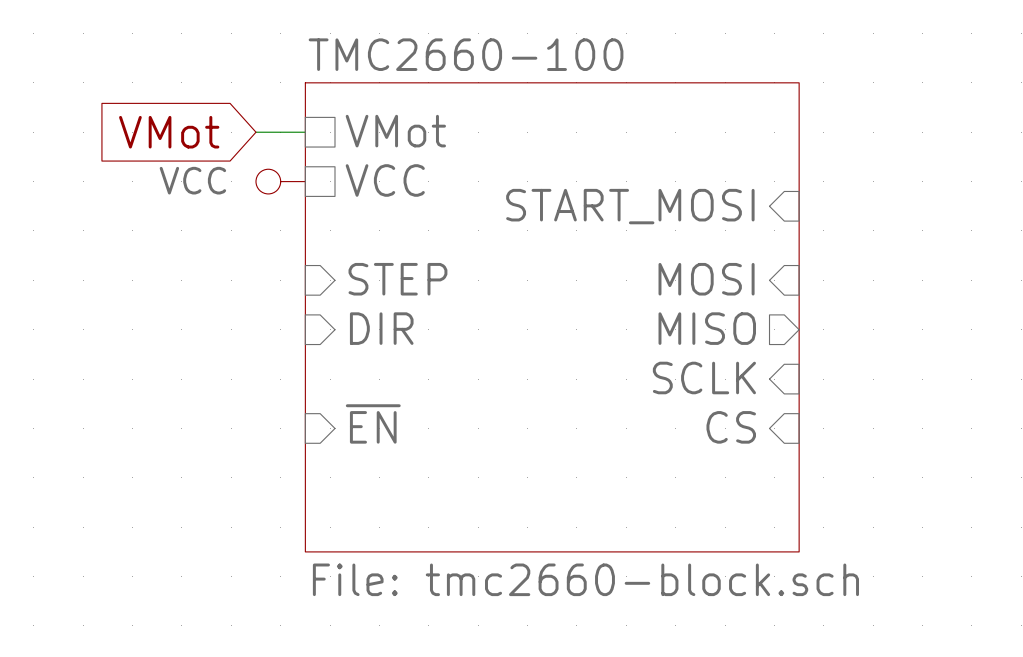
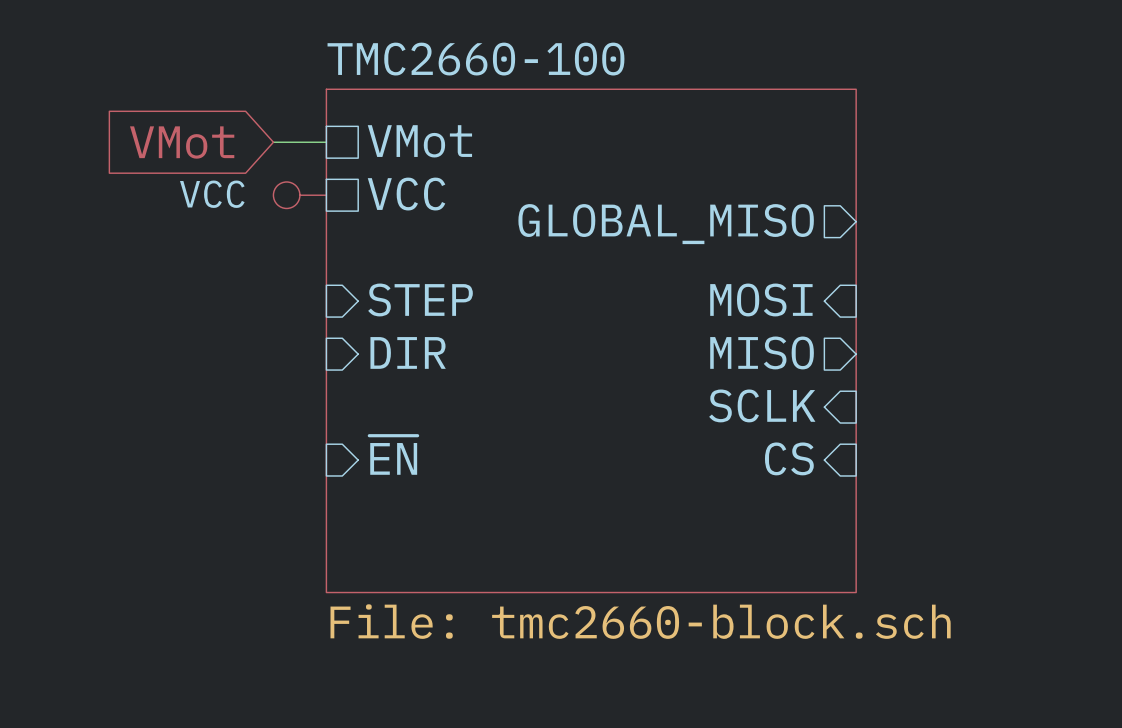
sheet pin shape: input (630, 206) -> output (666, 224)
sheet pin: START_MOSI (630, 206) -> GLOBAL_MISO (666, 224)

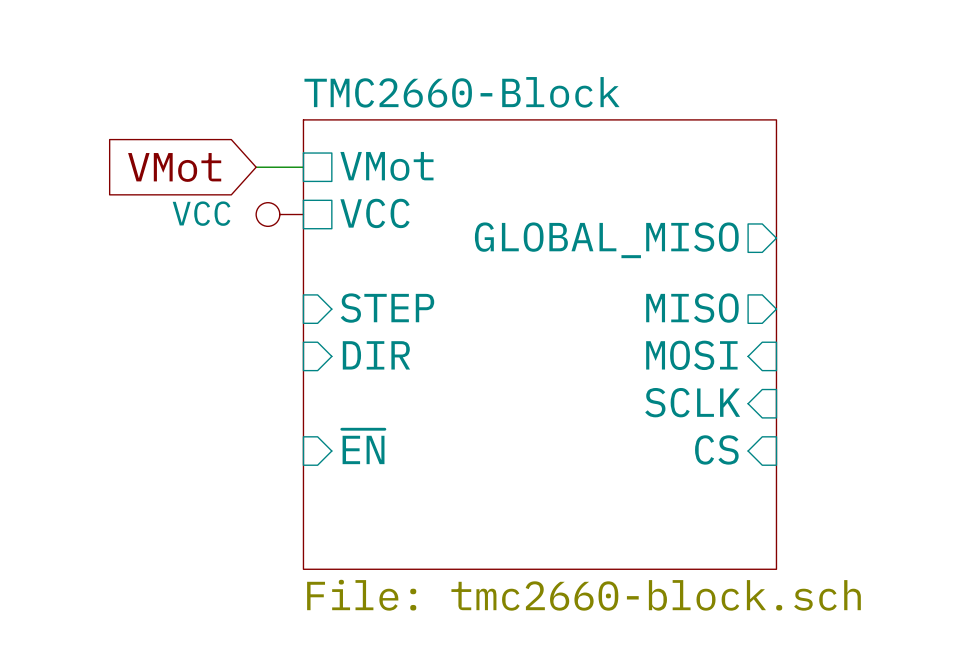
sheet TMC2660-100 name: TMC2660-100 (475, 59) -> TMC2660-Block (462, 92)
sheet pin shape: input (761, 299) -> output (692, 308)
sheet pin: MOSI (761, 299) -> MISO (692, 308)
sheet pin shape: output (762, 352) -> input (691, 355)
sheet pin: MISO (762, 352) -> MOSI (691, 355)

